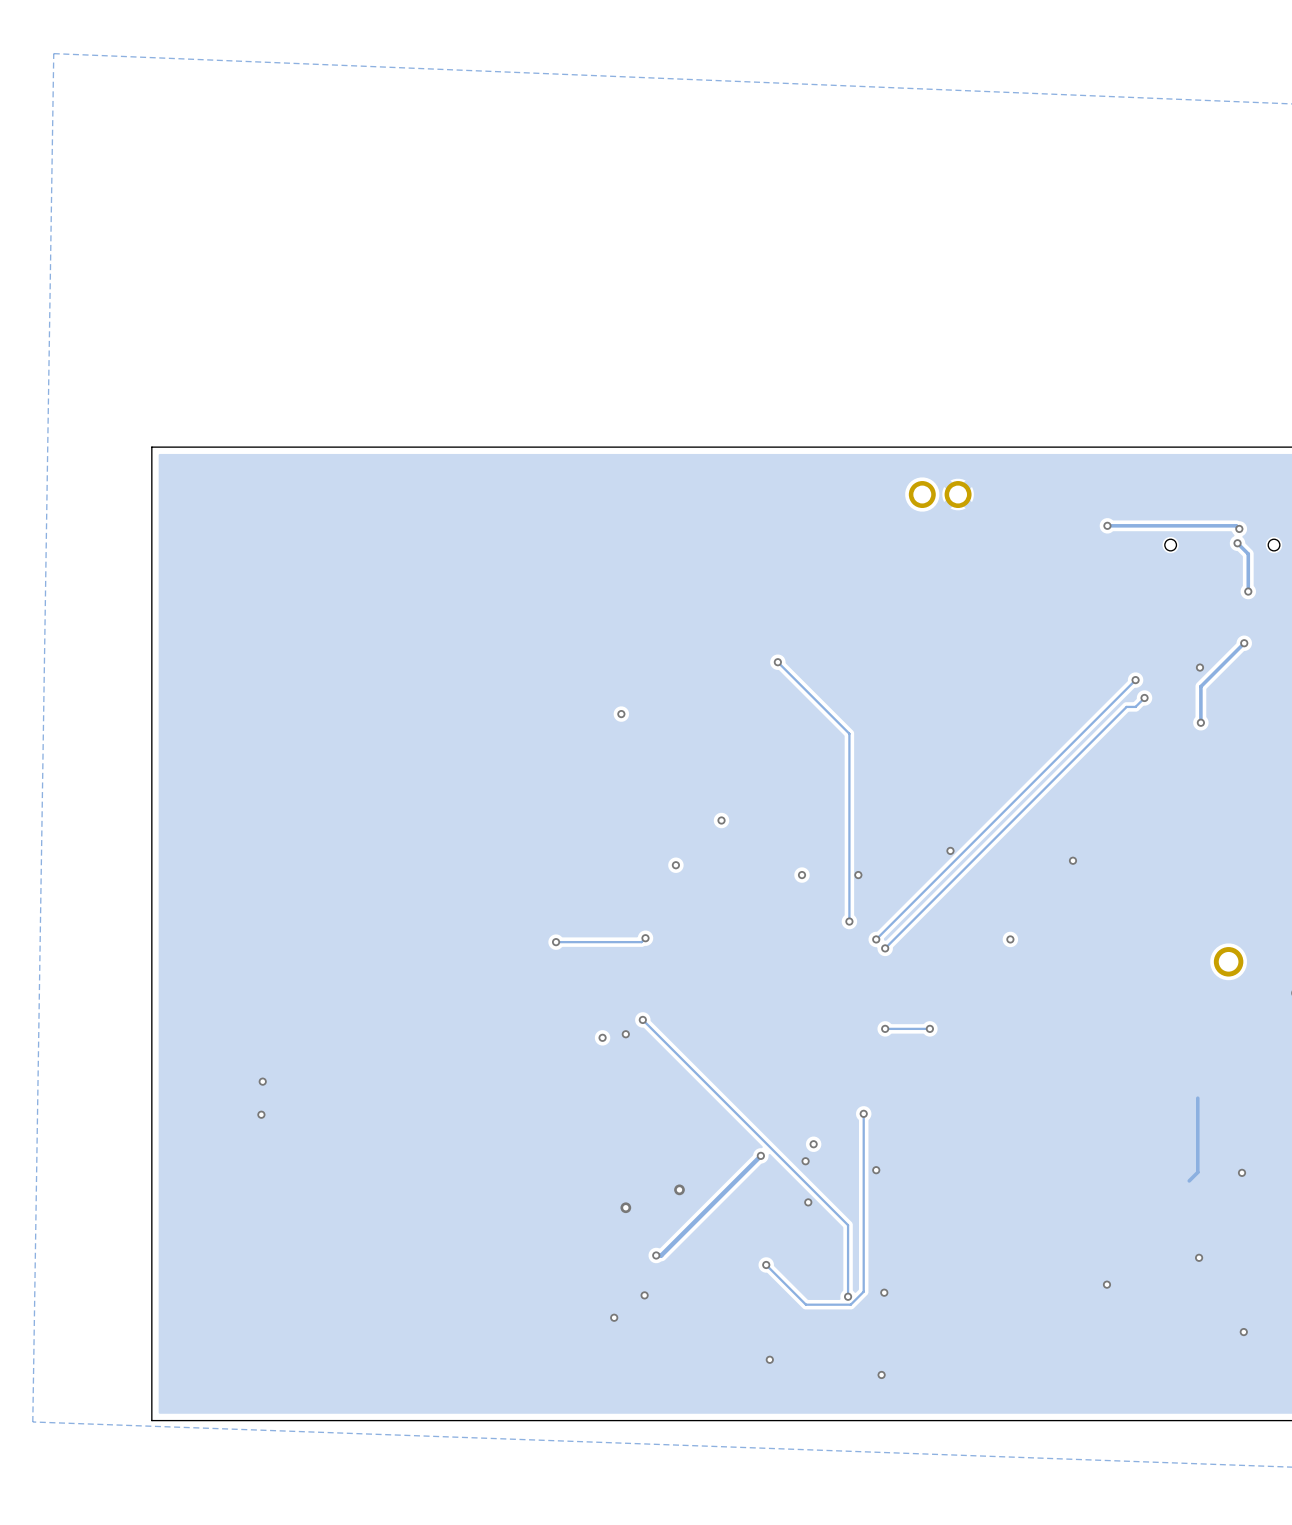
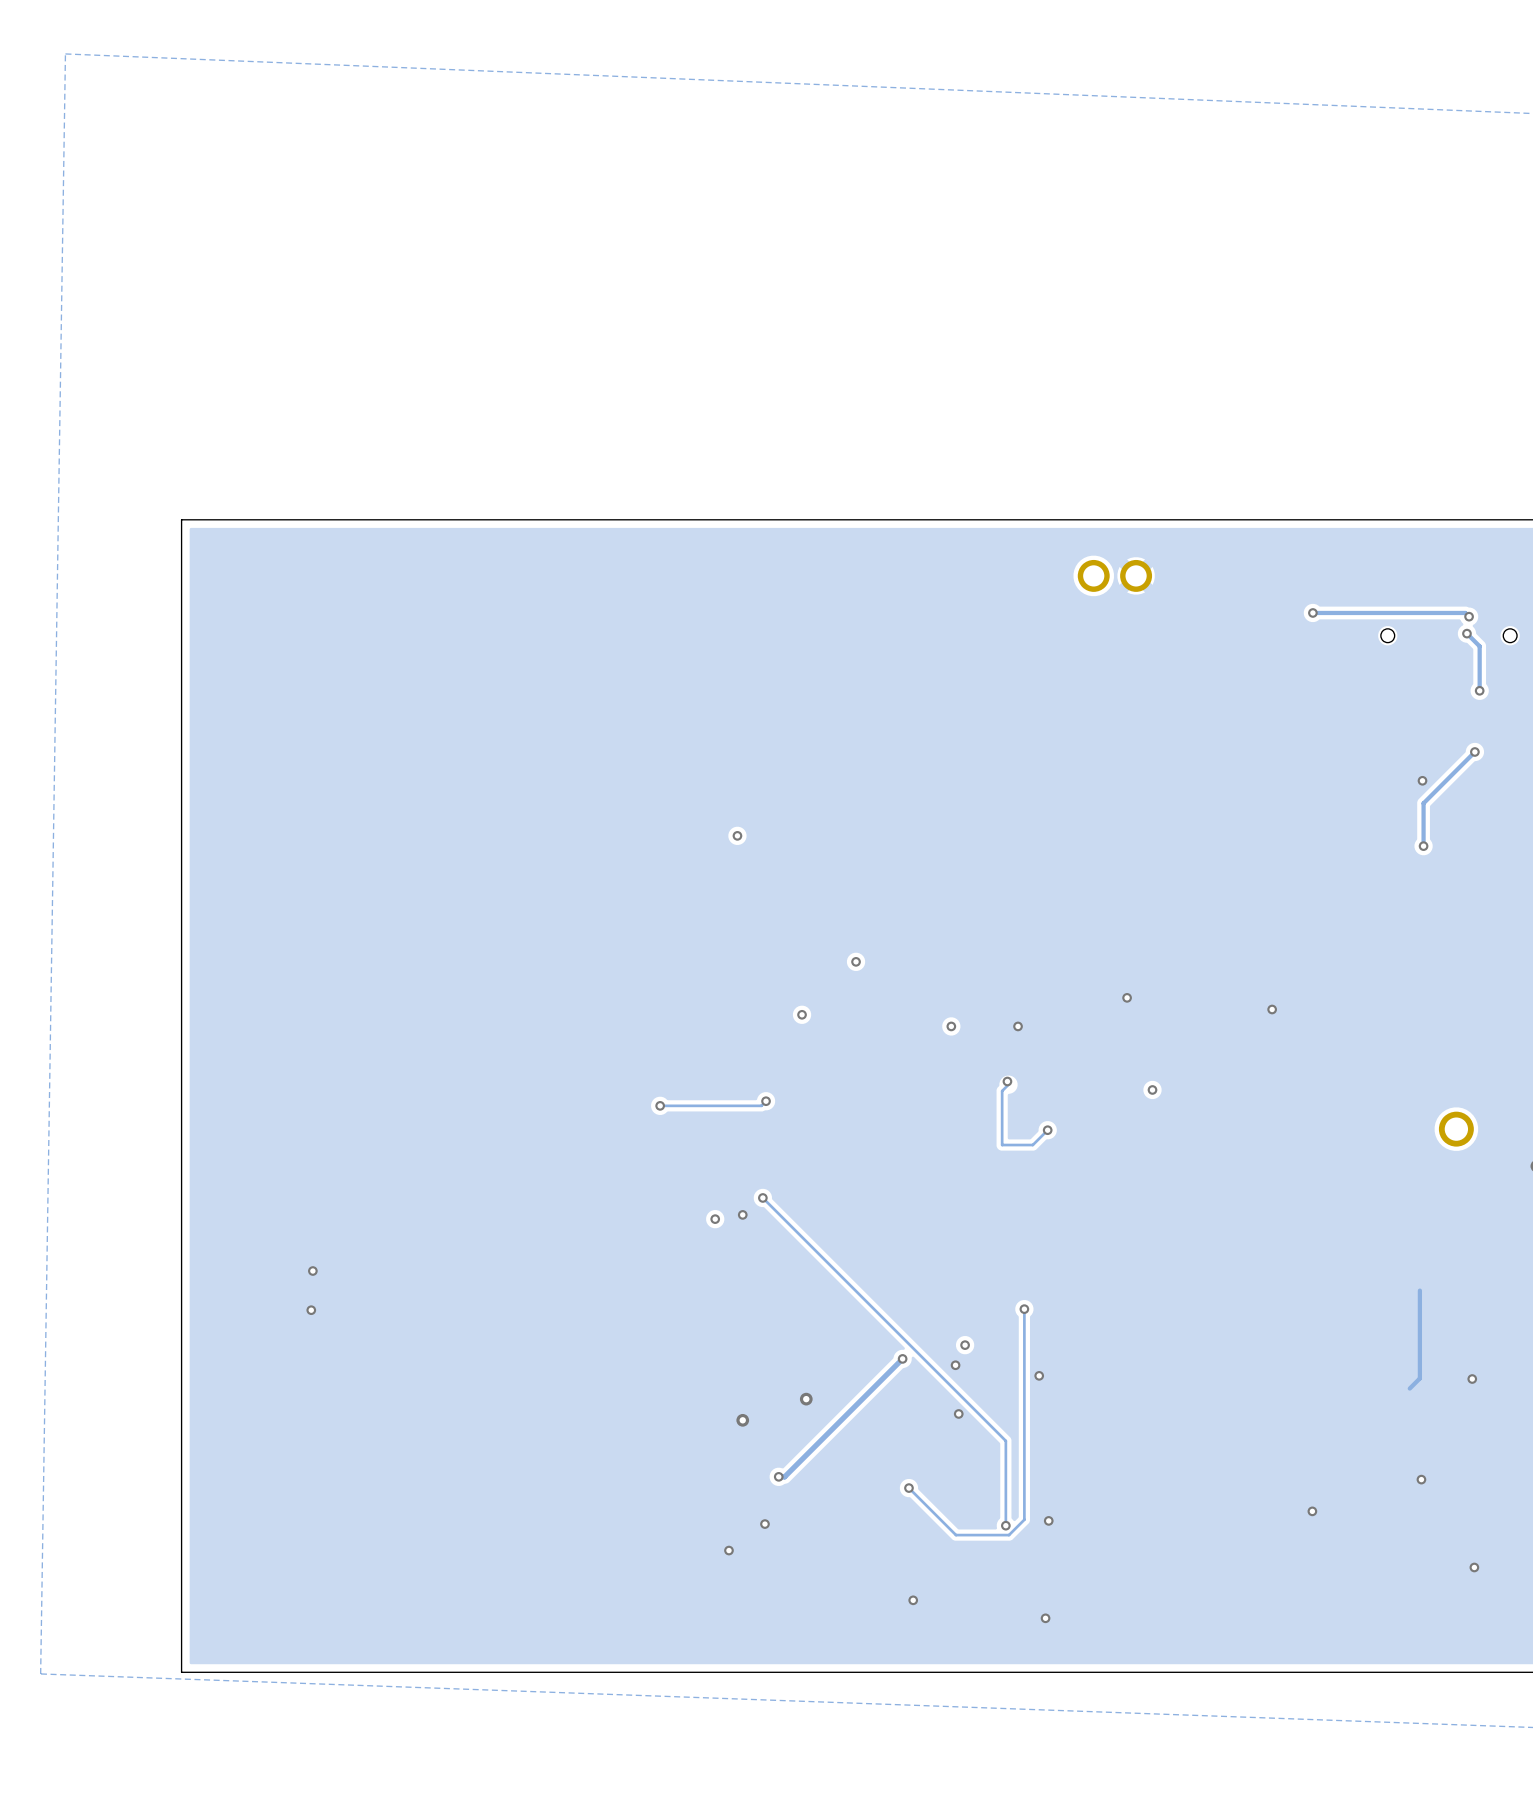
track: (777, 662) (849, 733) (849, 921) -> none
via: (777, 662) -> none
track: (1135, 680) (876, 939) -> none
via: (1135, 680) -> none
track: (1144, 697) (1135, 706) (1126, 706) (885, 948) -> none
via: (1144, 697) -> none
track: none -> (1008, 1084) (1002, 1091) (1002, 1145) (1032, 1145) (1047, 1130)
via: (876, 939) -> none
via position: (1010, 939) -> (1152, 1089)
via: (885, 948) -> none
via: none -> (1047, 1130)
via: (885, 1028) -> none
track: (929, 1028) (885, 1028) -> none
via: (929, 1028) -> none

